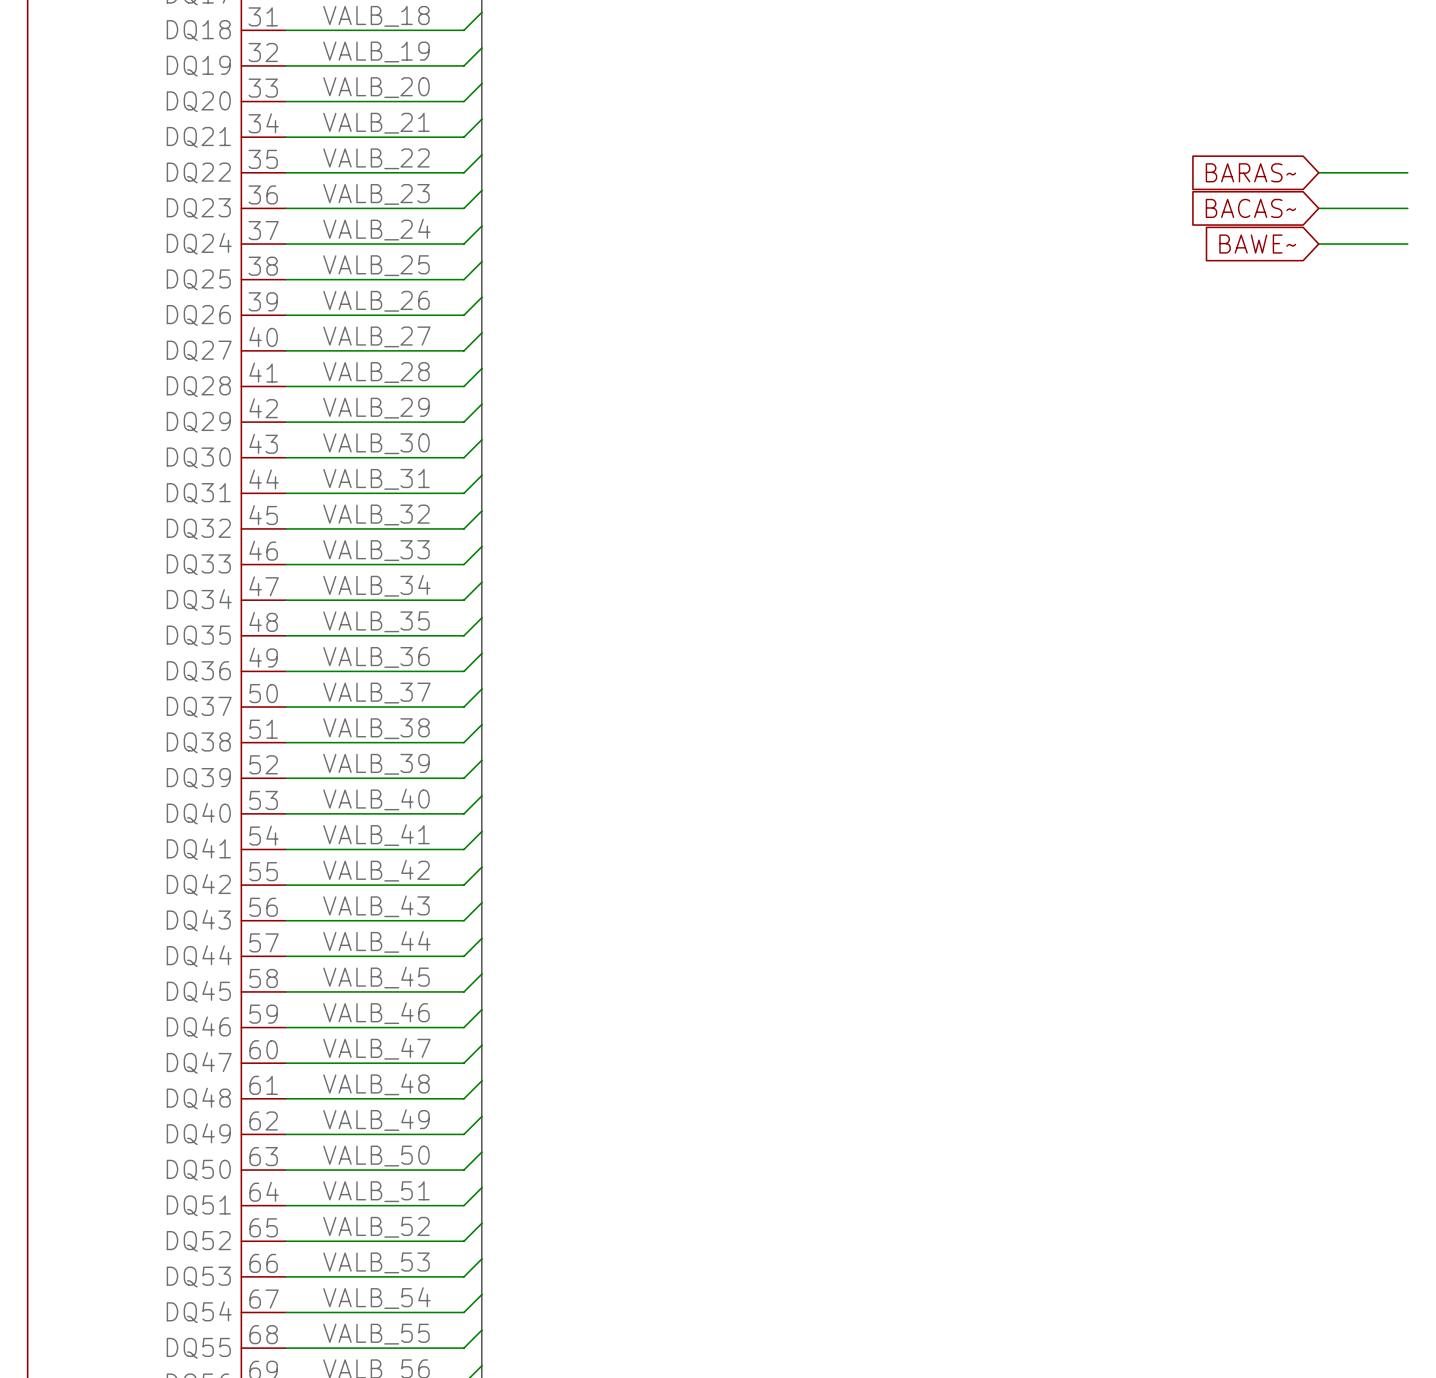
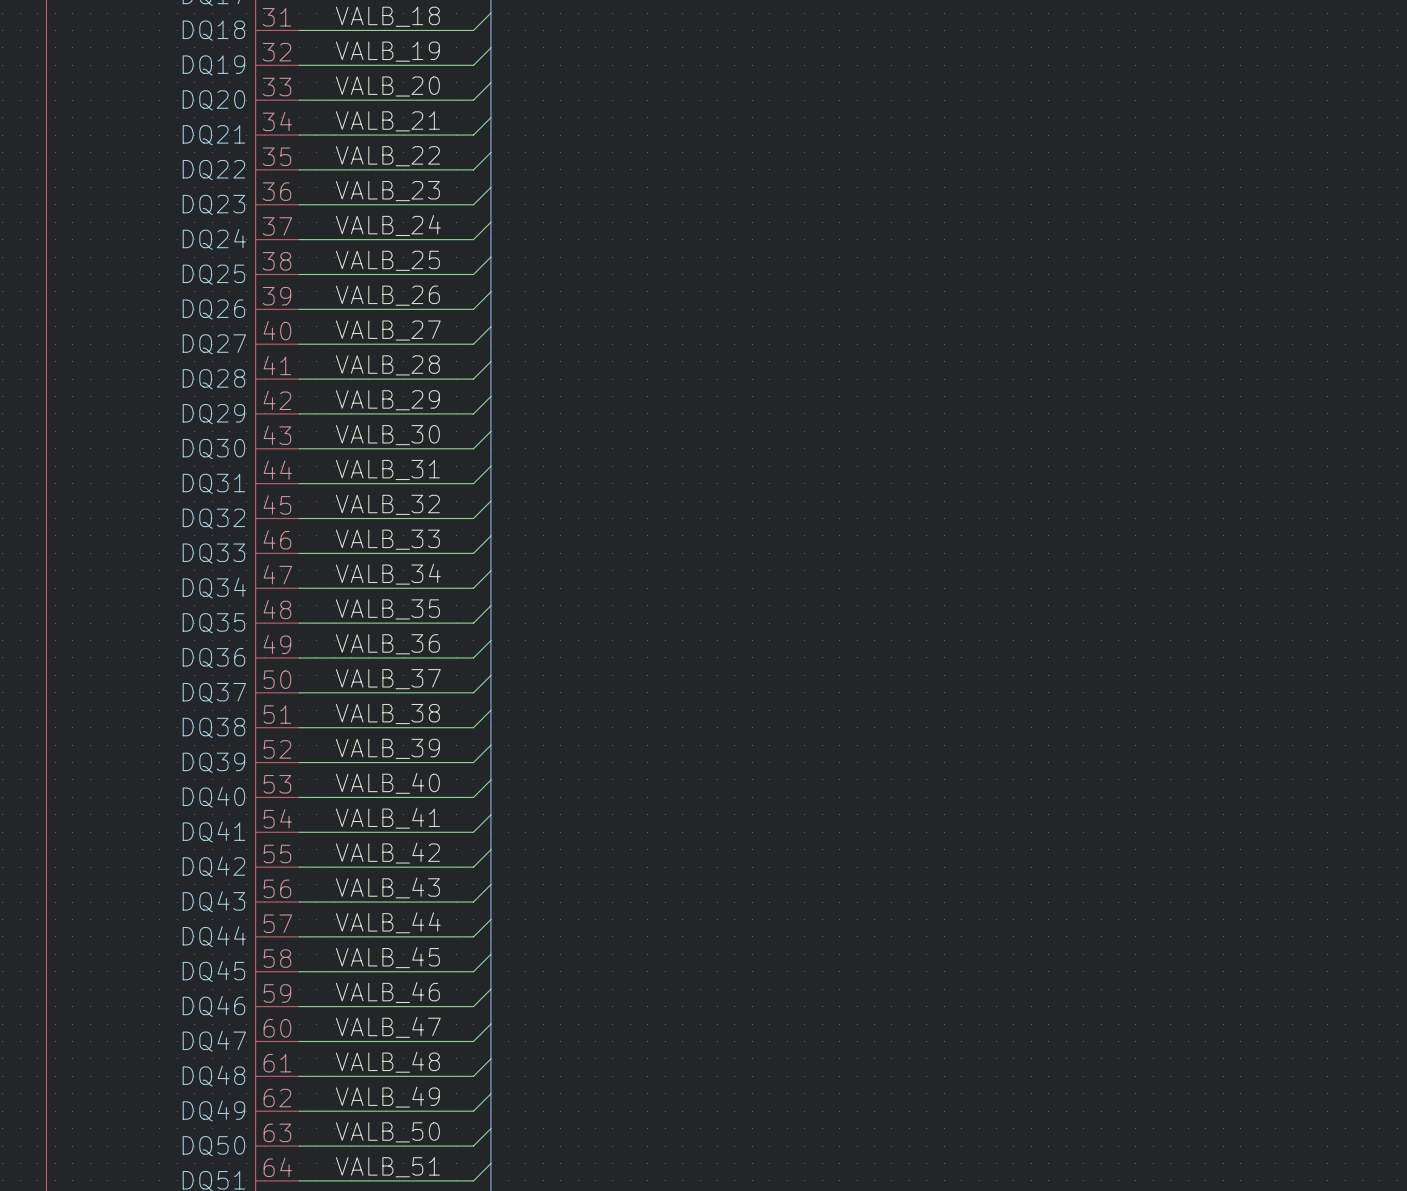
global label: BARAS~ (1250, 172) -> none
wire: (1318, 172) (1407, 172) -> none
global label: BACAS~ (1250, 208) -> none
wire: (1318, 208) (1407, 208) -> none
global label: BAWE~ (1257, 244) -> none
wire: (1318, 244) (1407, 244) -> none

